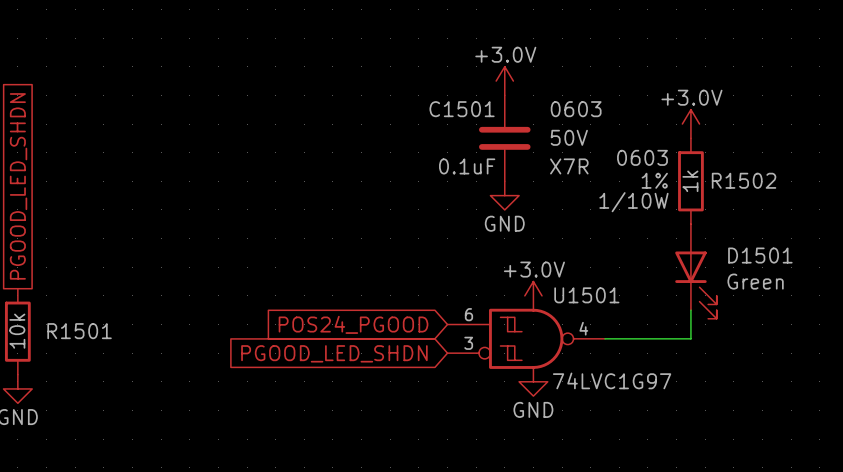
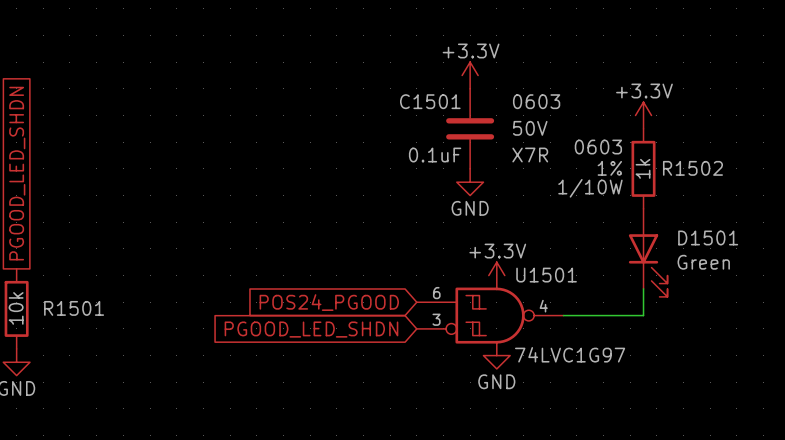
power symbol: +3.0V (504, 81) -> +3.3V (470, 75)
power symbol: +3.0V (690, 124) -> +3.3V (643, 115)
power symbol: +3.0V (533, 295) -> +3.3V (496, 275)

